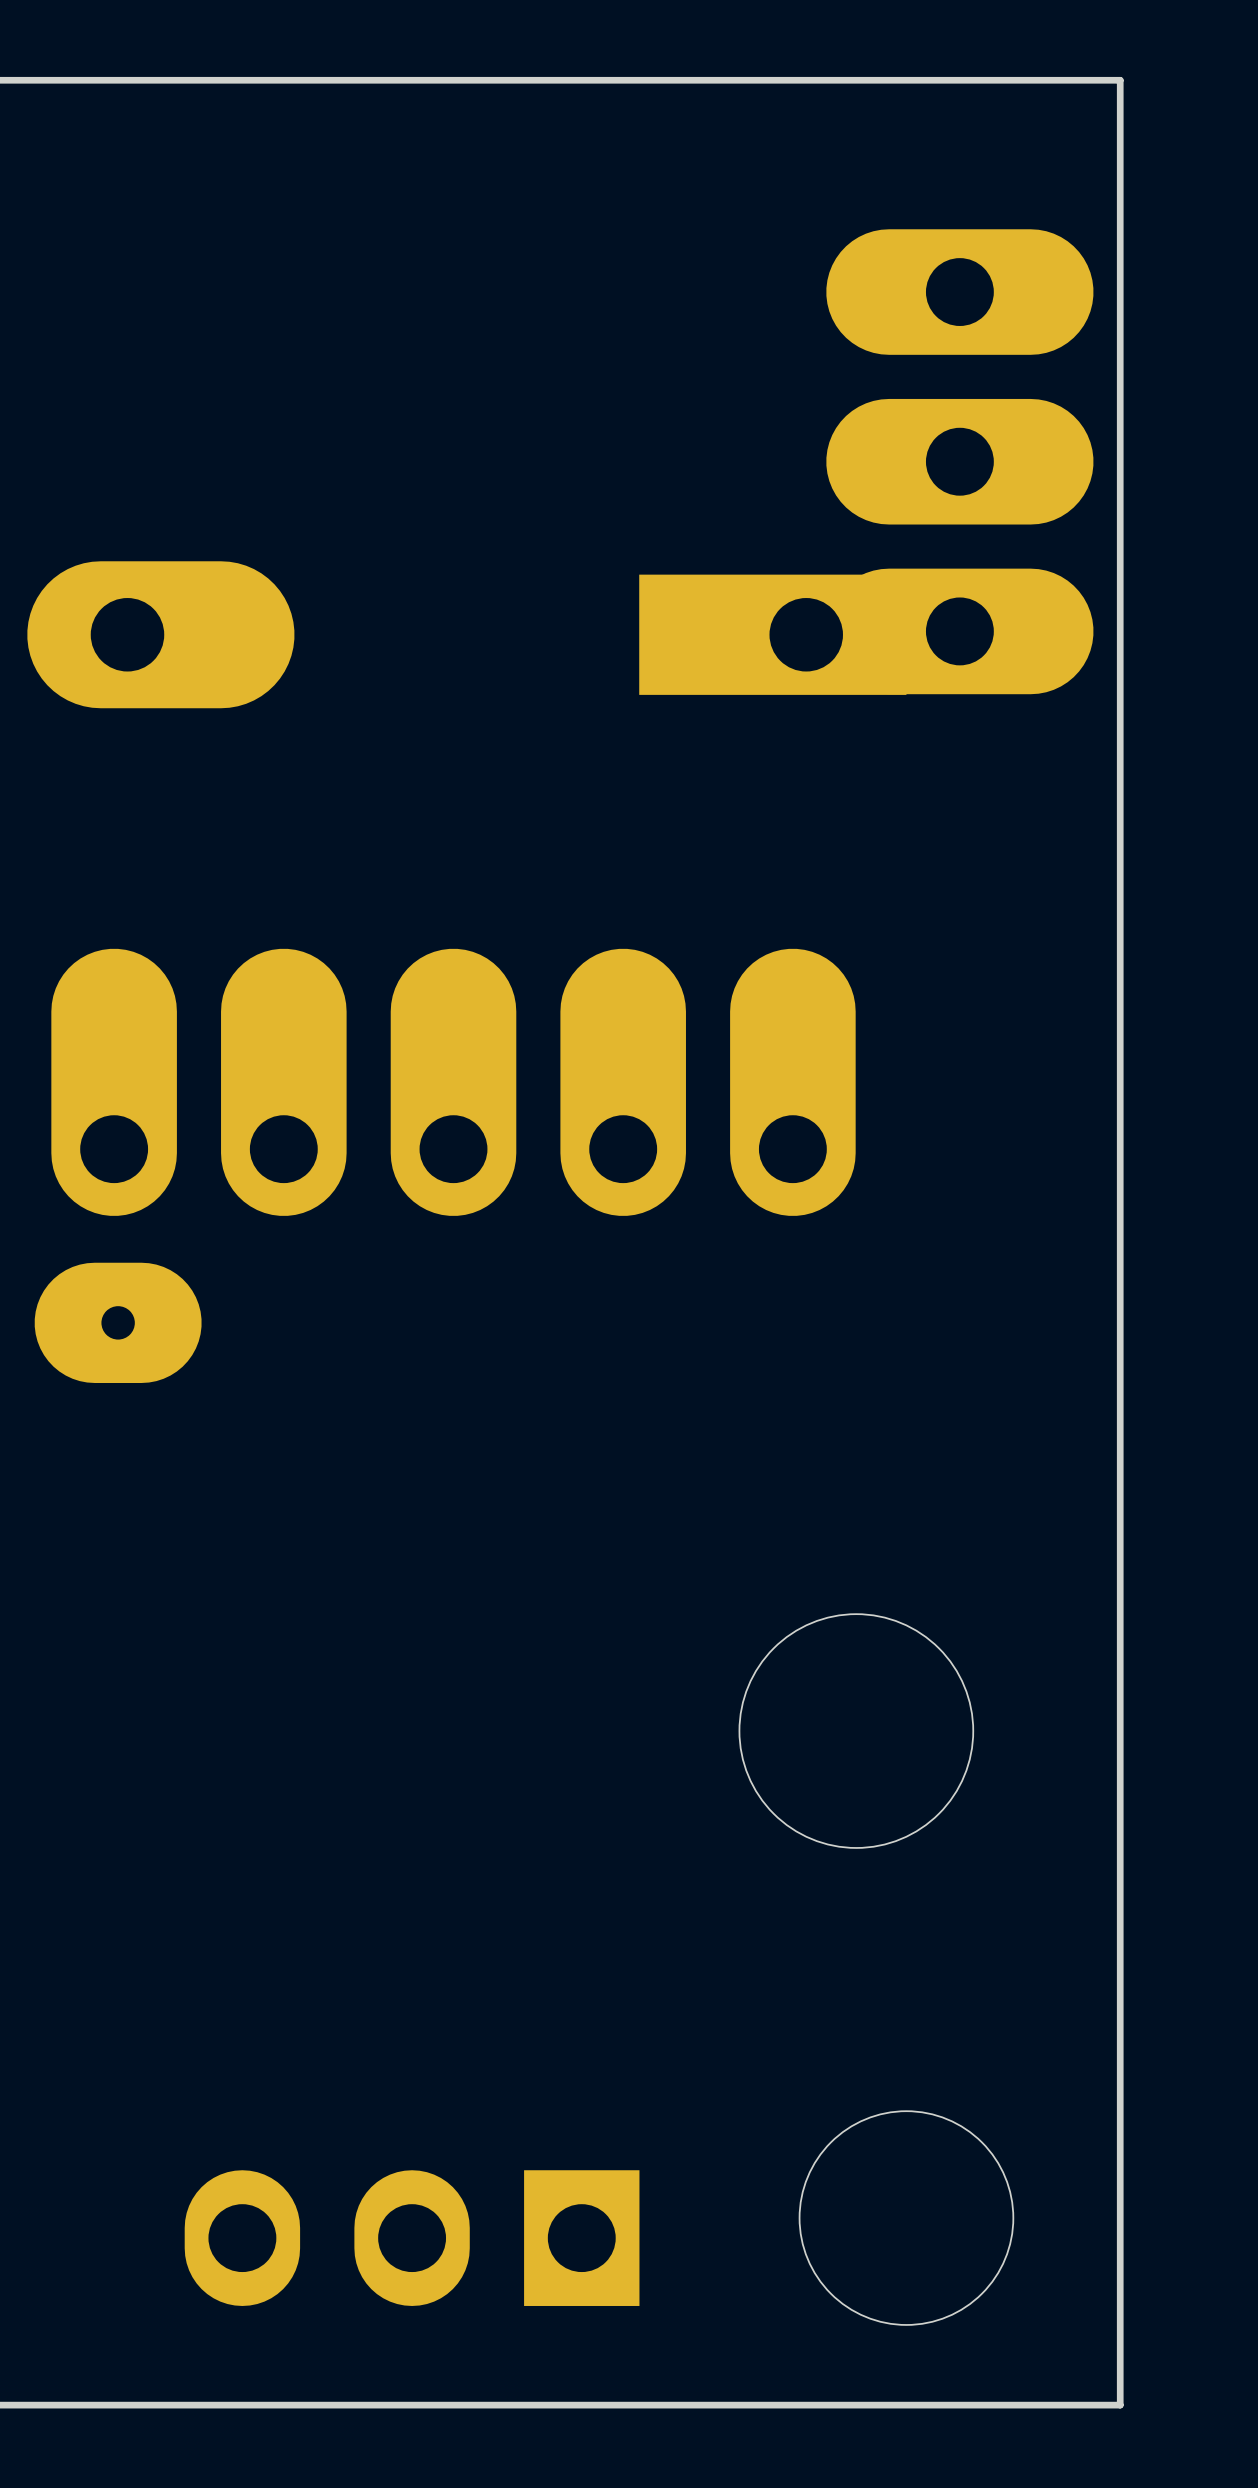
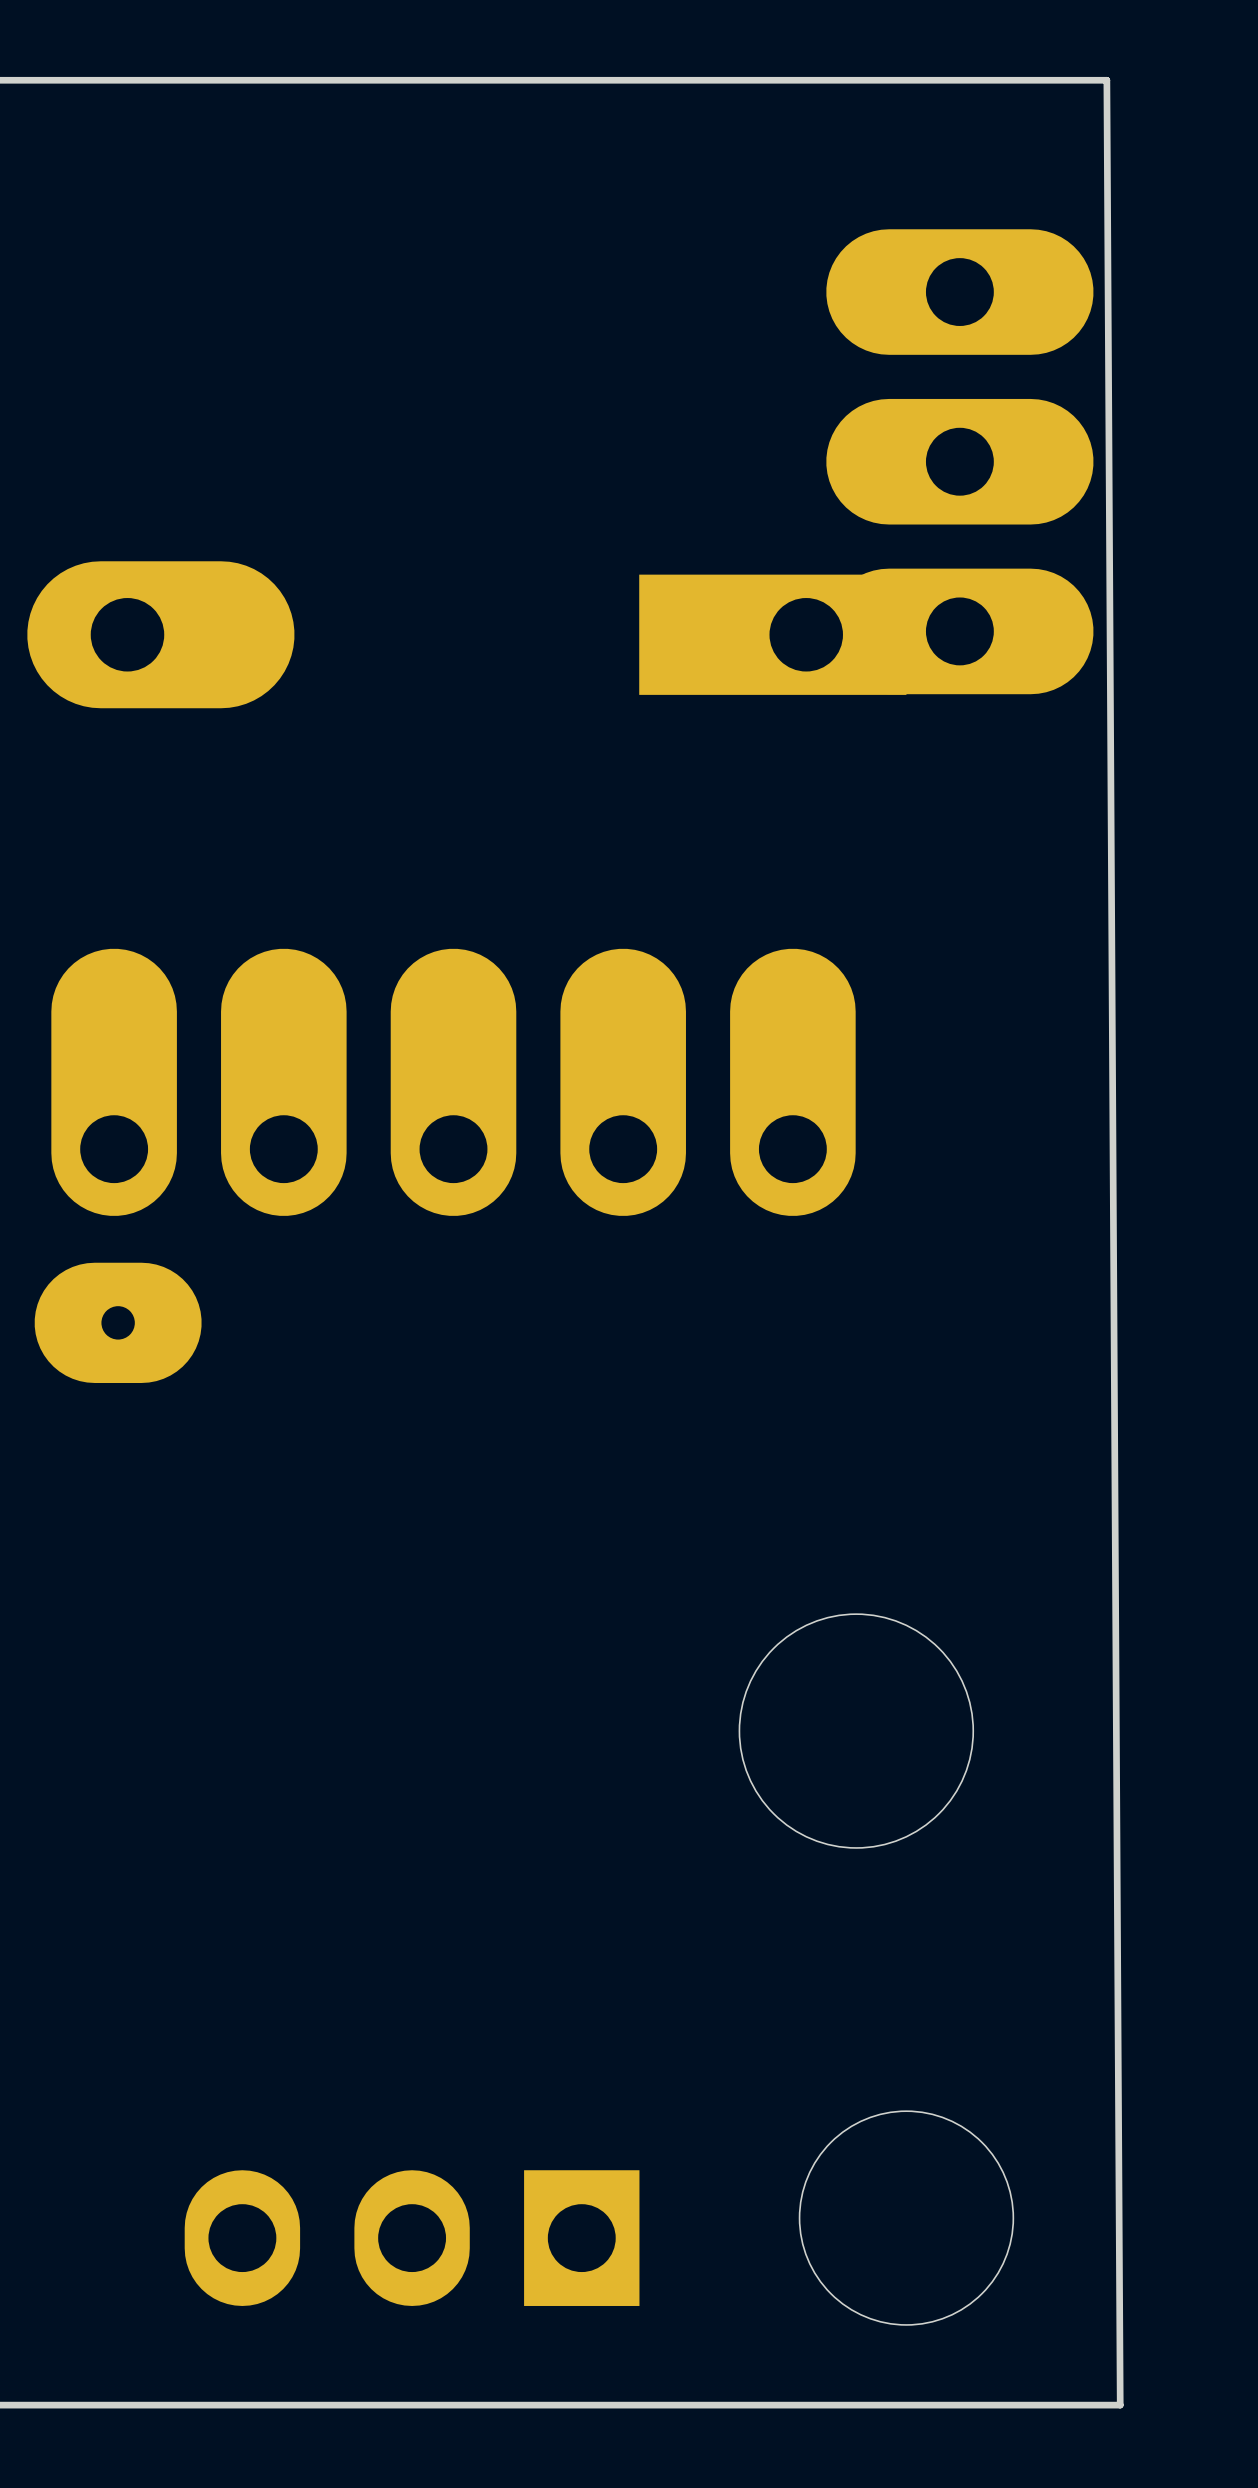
board edge: (1106, 80) (1120, 80) (1120, 2405) -> (1106, 80) (1120, 2405)

